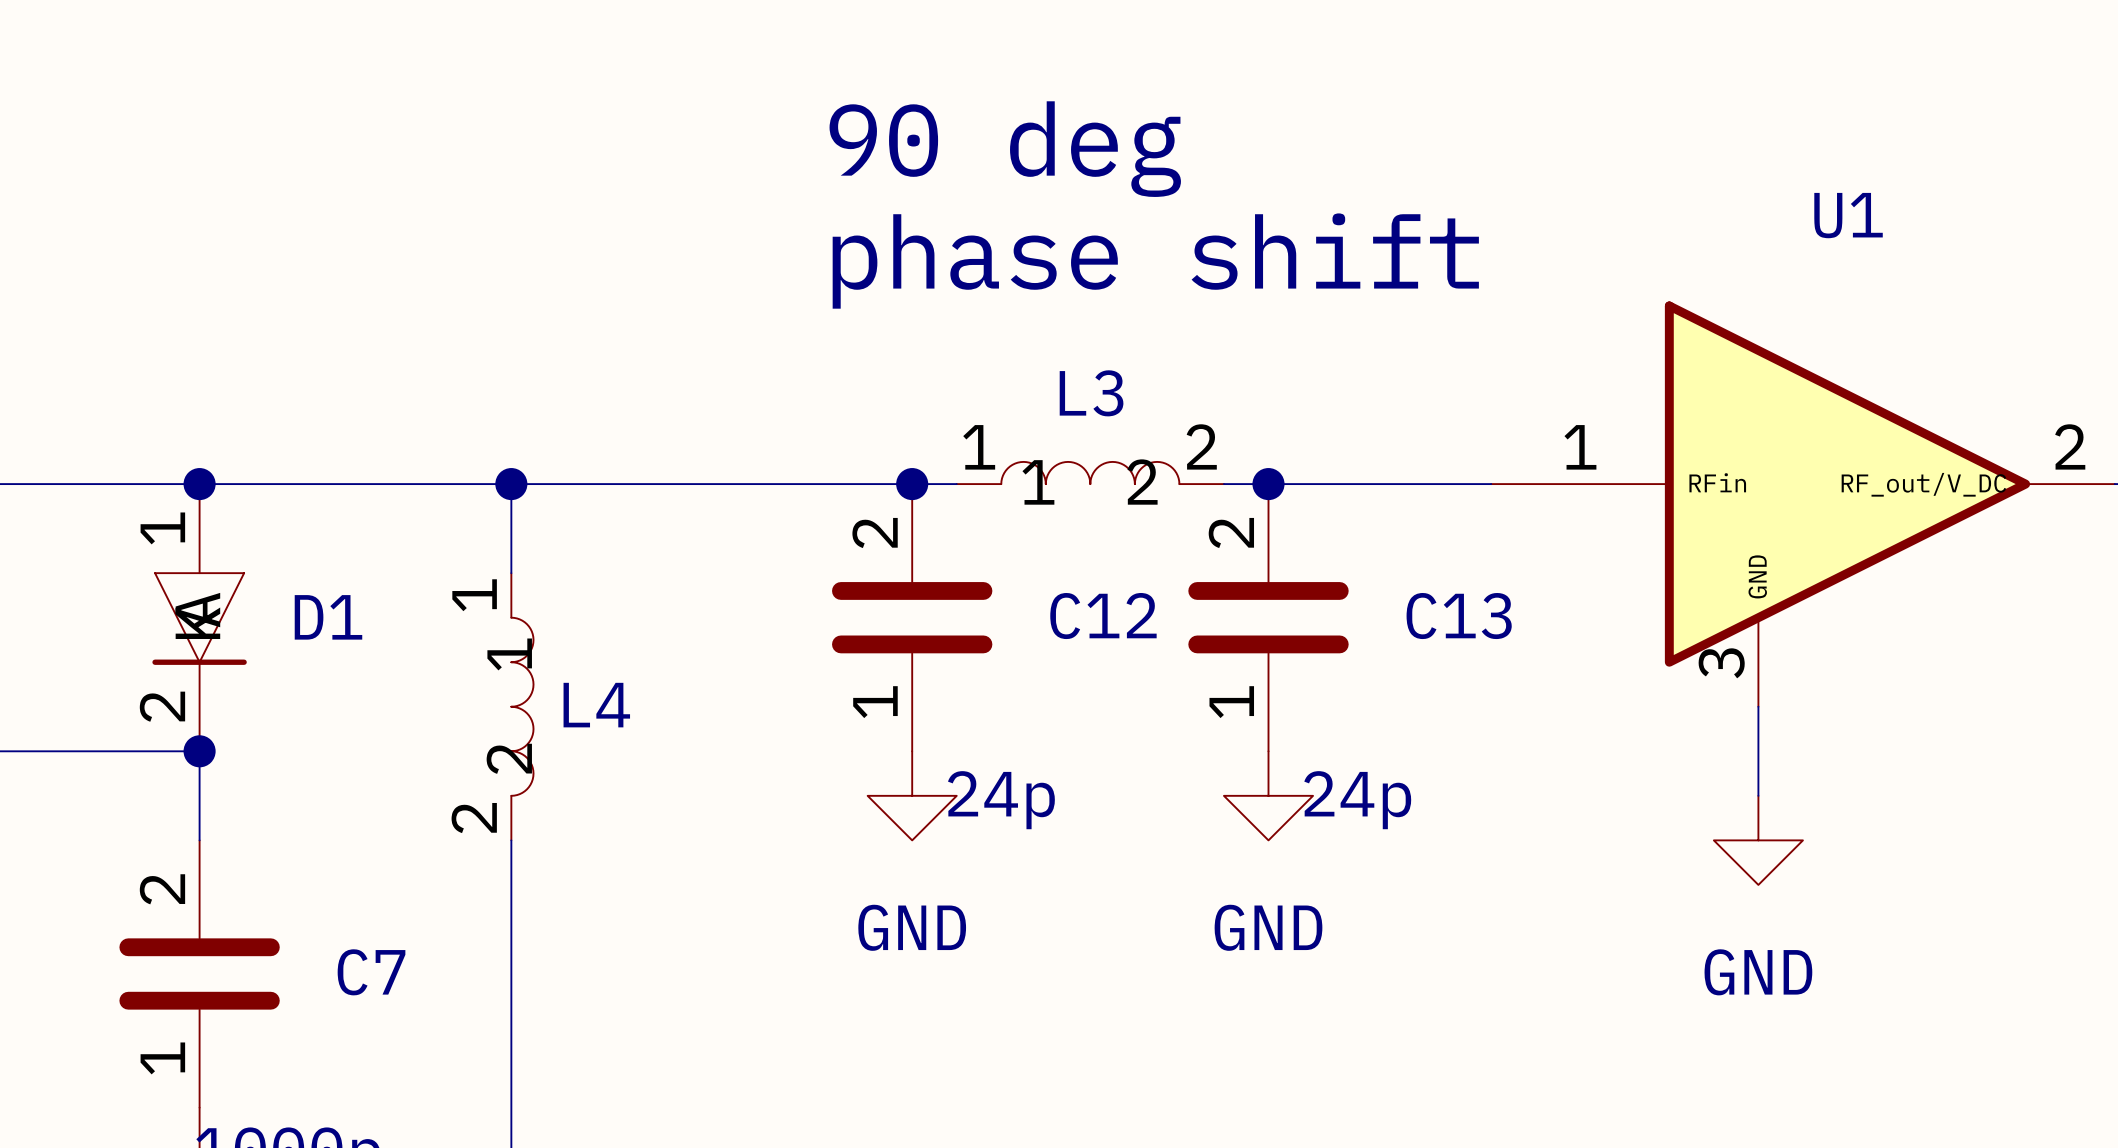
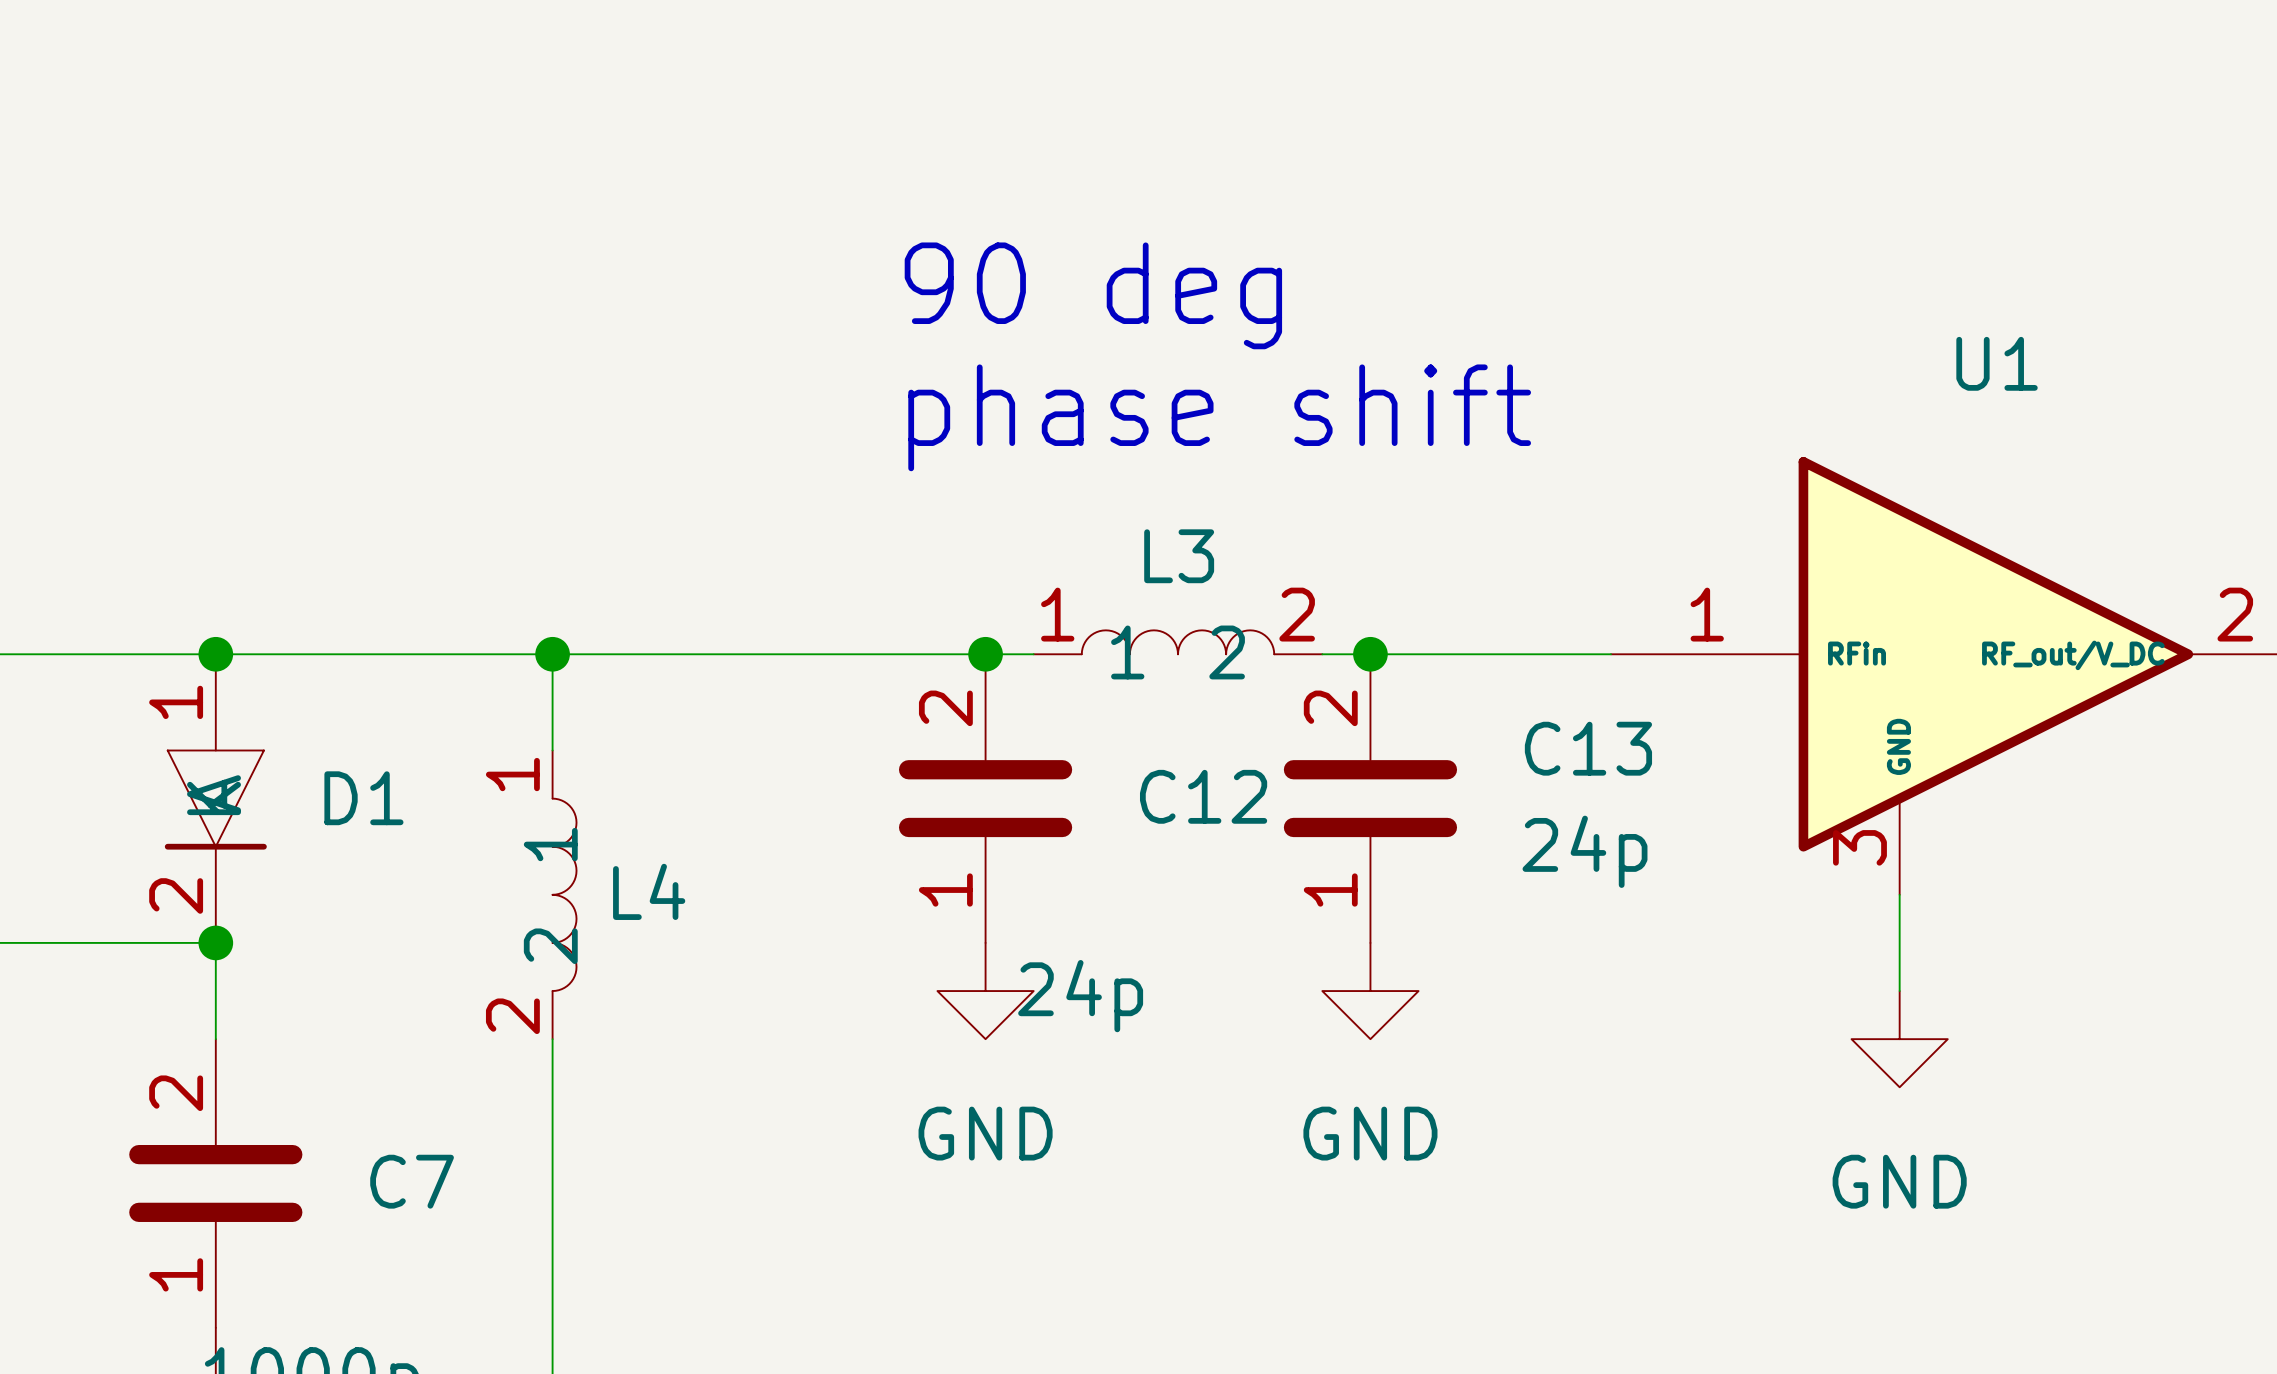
C13 name position: C13 (1459, 616) -> C13 (1588, 748)
C13 value position: 24p (1357, 800) -> 24p (1585, 851)

